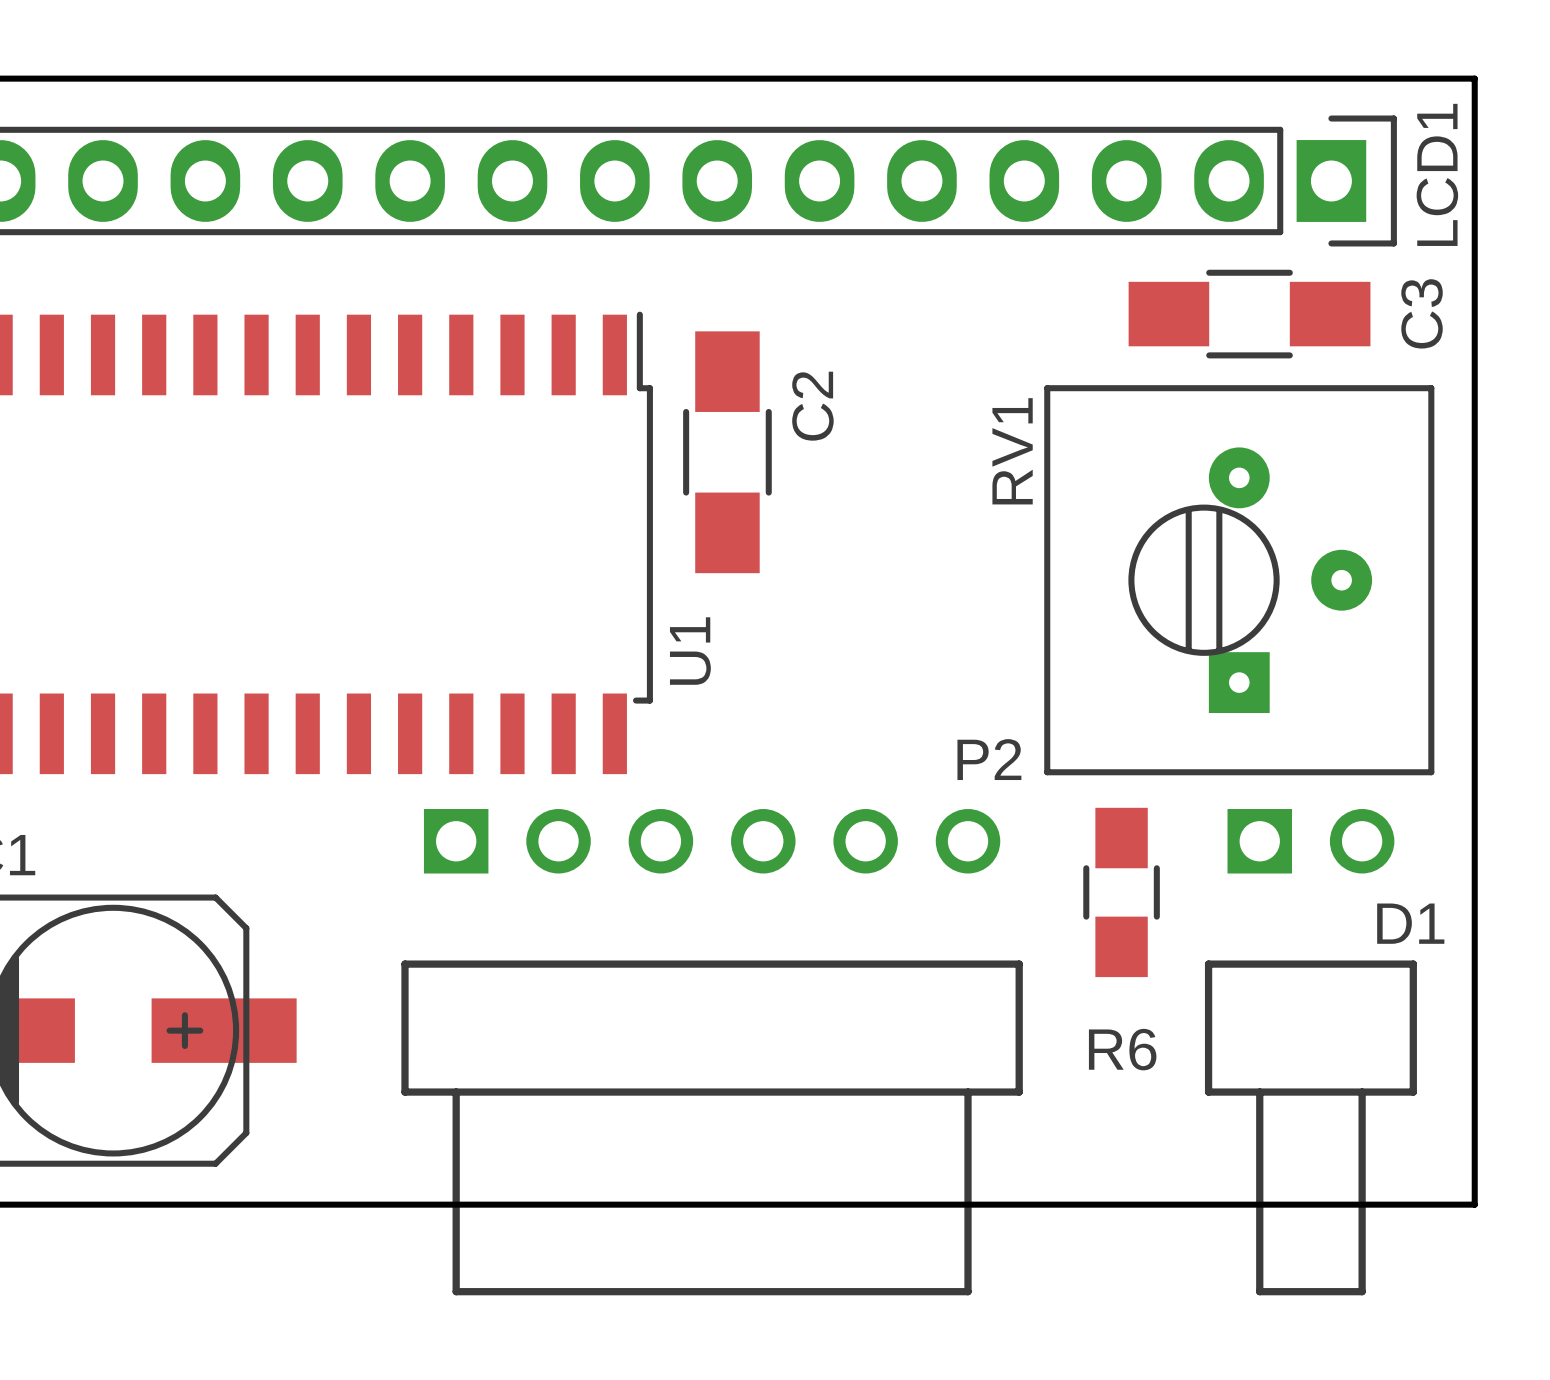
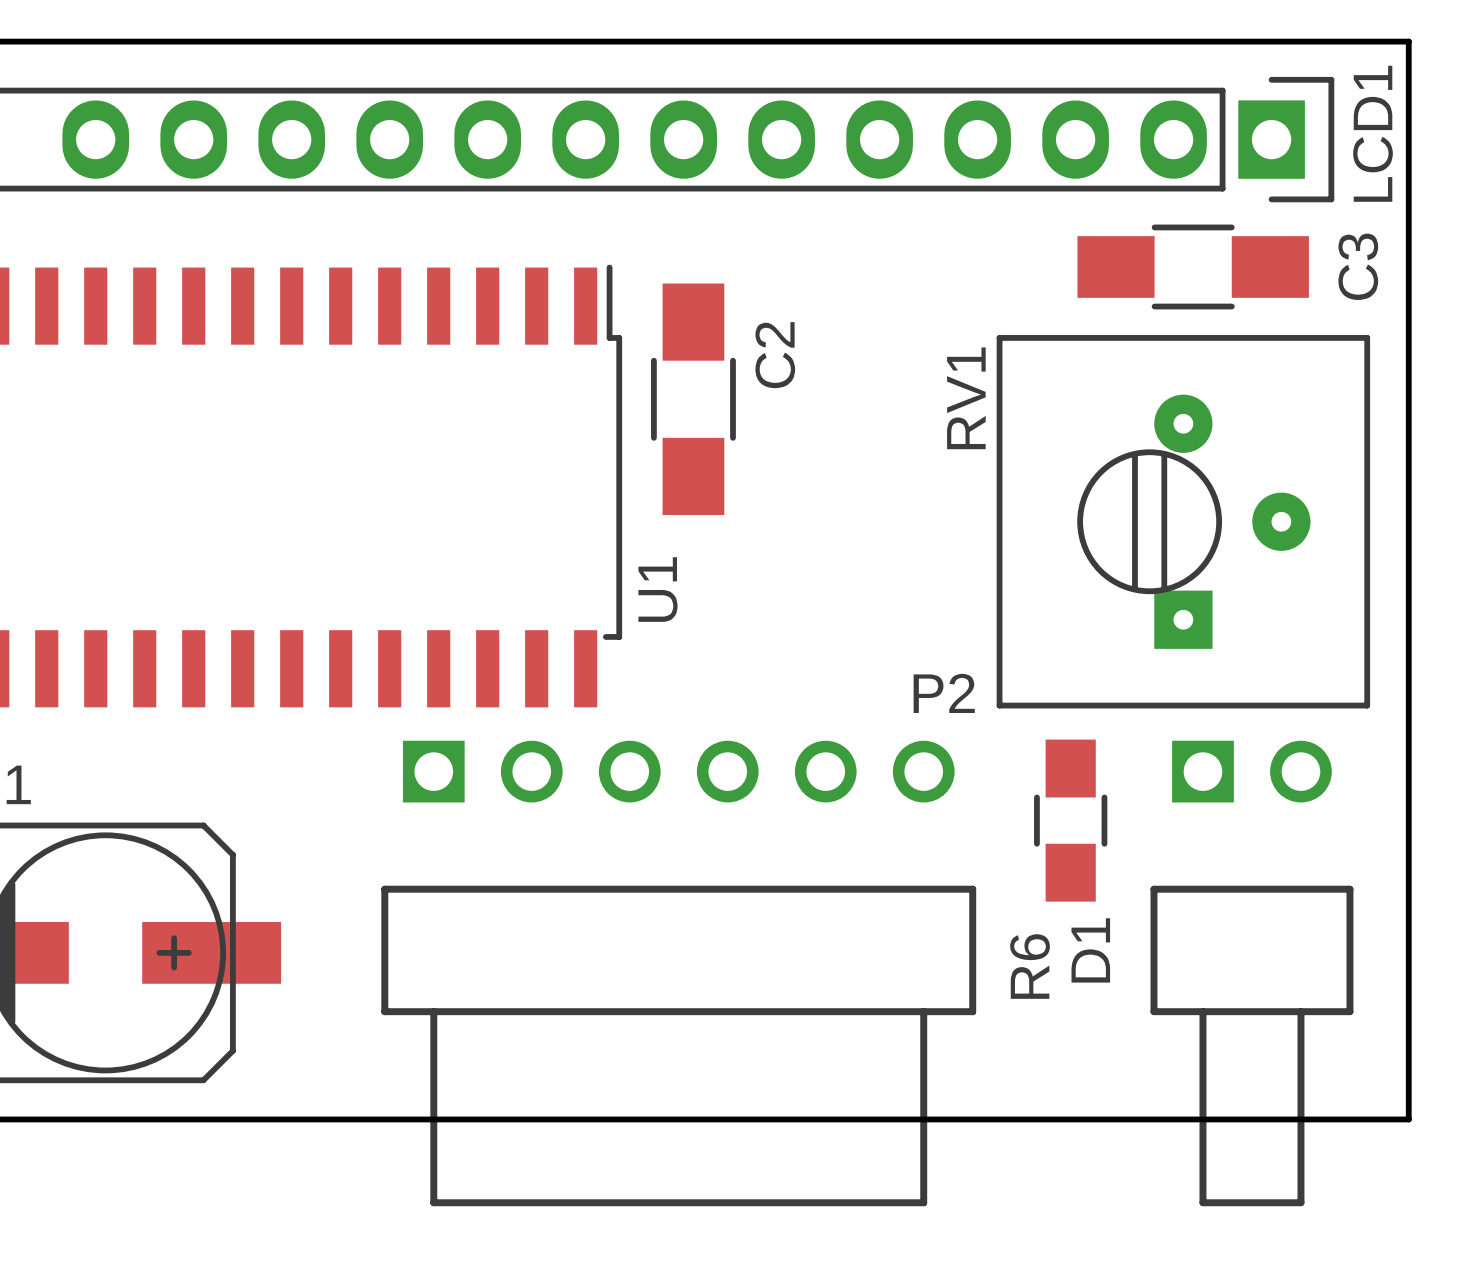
D1 name rotation: 0° (1410, 923) -> 90° counterclockwise (1090, 950)
D1 name position: D1 (1410, 923) -> D1 (1090, 950)
R6 name rotation: 0° (1122, 1049) -> 90° counterclockwise (1030, 966)

